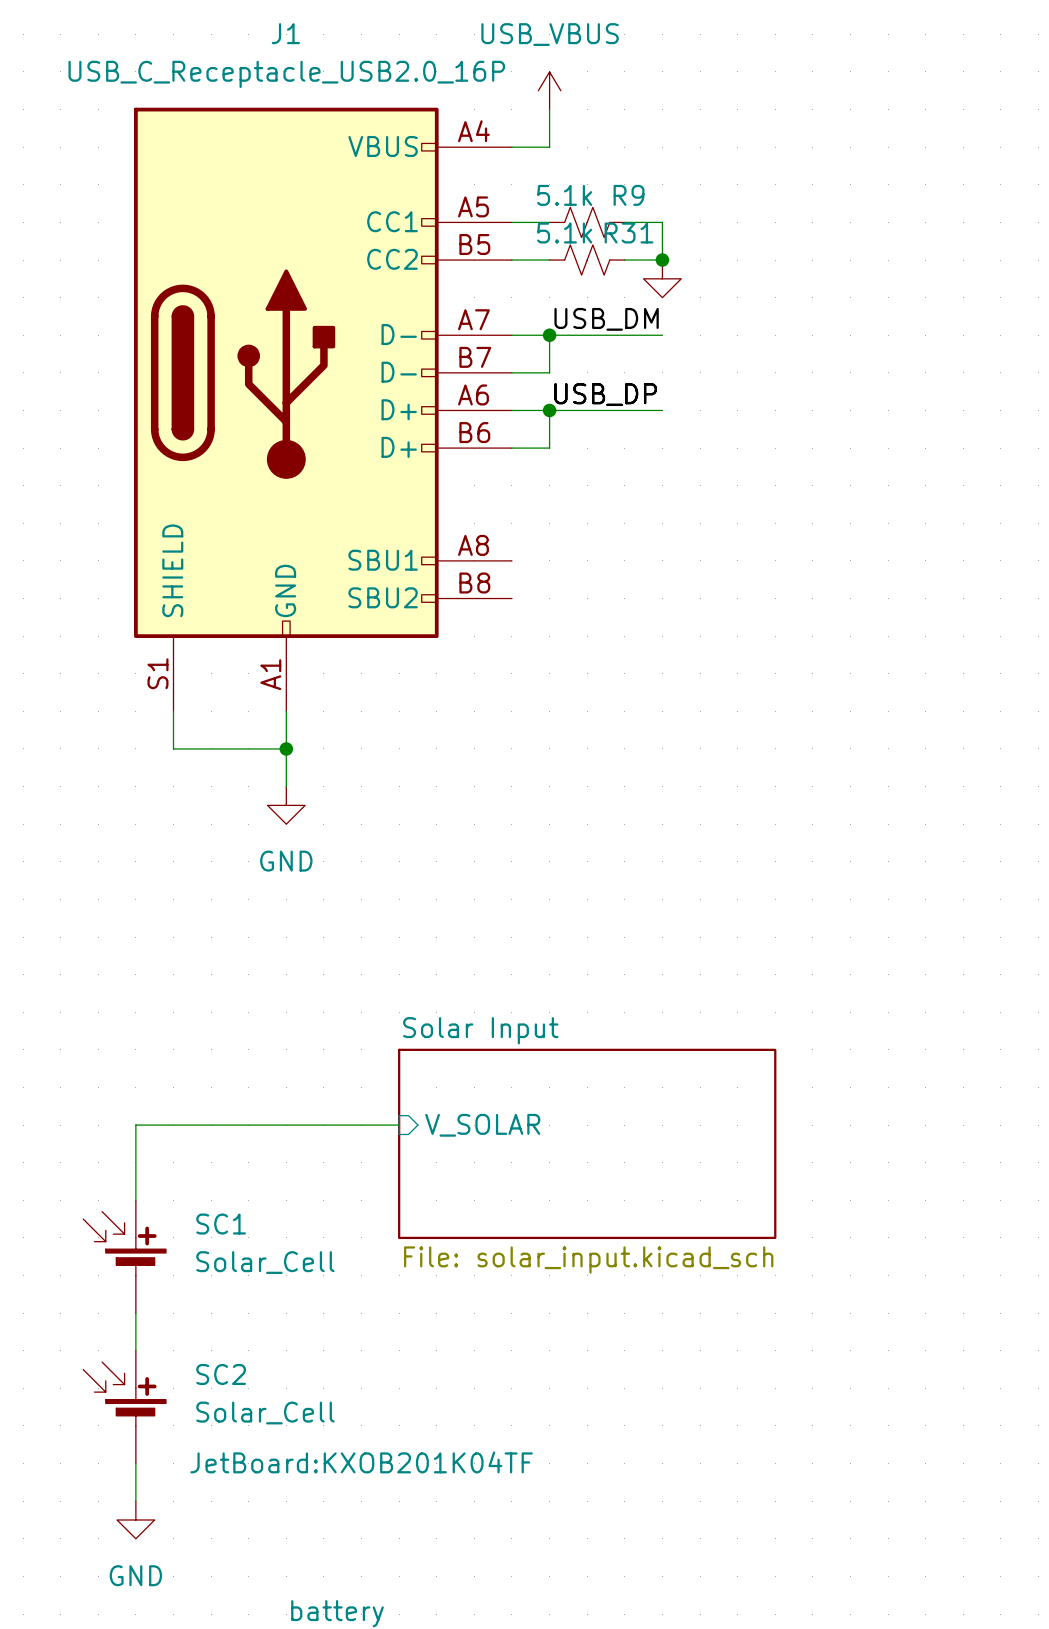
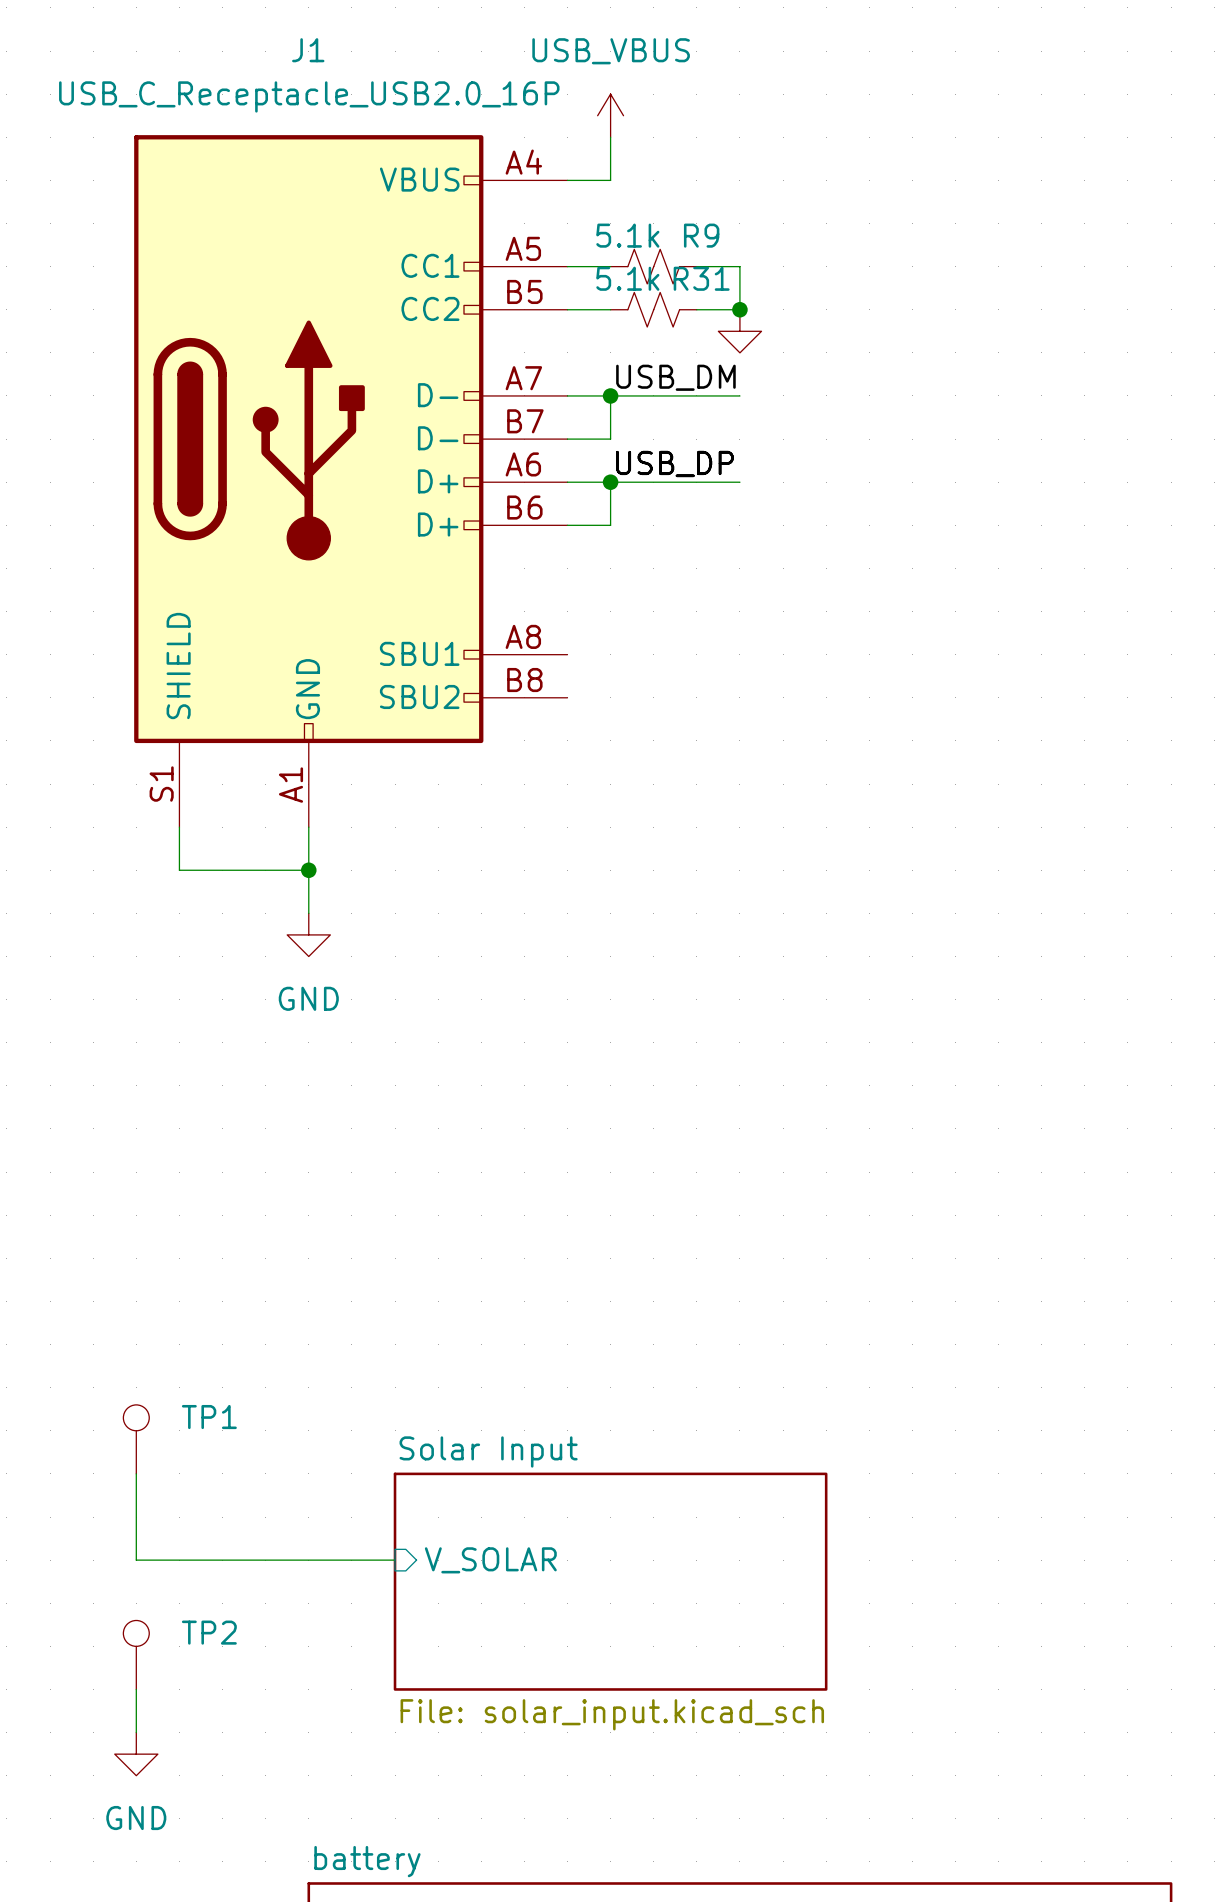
wire: (399, 1125) (135, 1125) (135, 1200) -> none
sheet pin position: V_SOLAR (482, 1125) -> V_SOLAR (490, 1560)
sheet Solar Input position: (587, 1143) -> (610, 1581)
TP1: none -> (136, 1439)
SC1: Solar_Cell (124, 1256) -> none
wire: none -> (136, 1560) (395, 1560)
SC2: Solar_Cell (124, 1407) -> none
TP2: none -> (136, 1654)

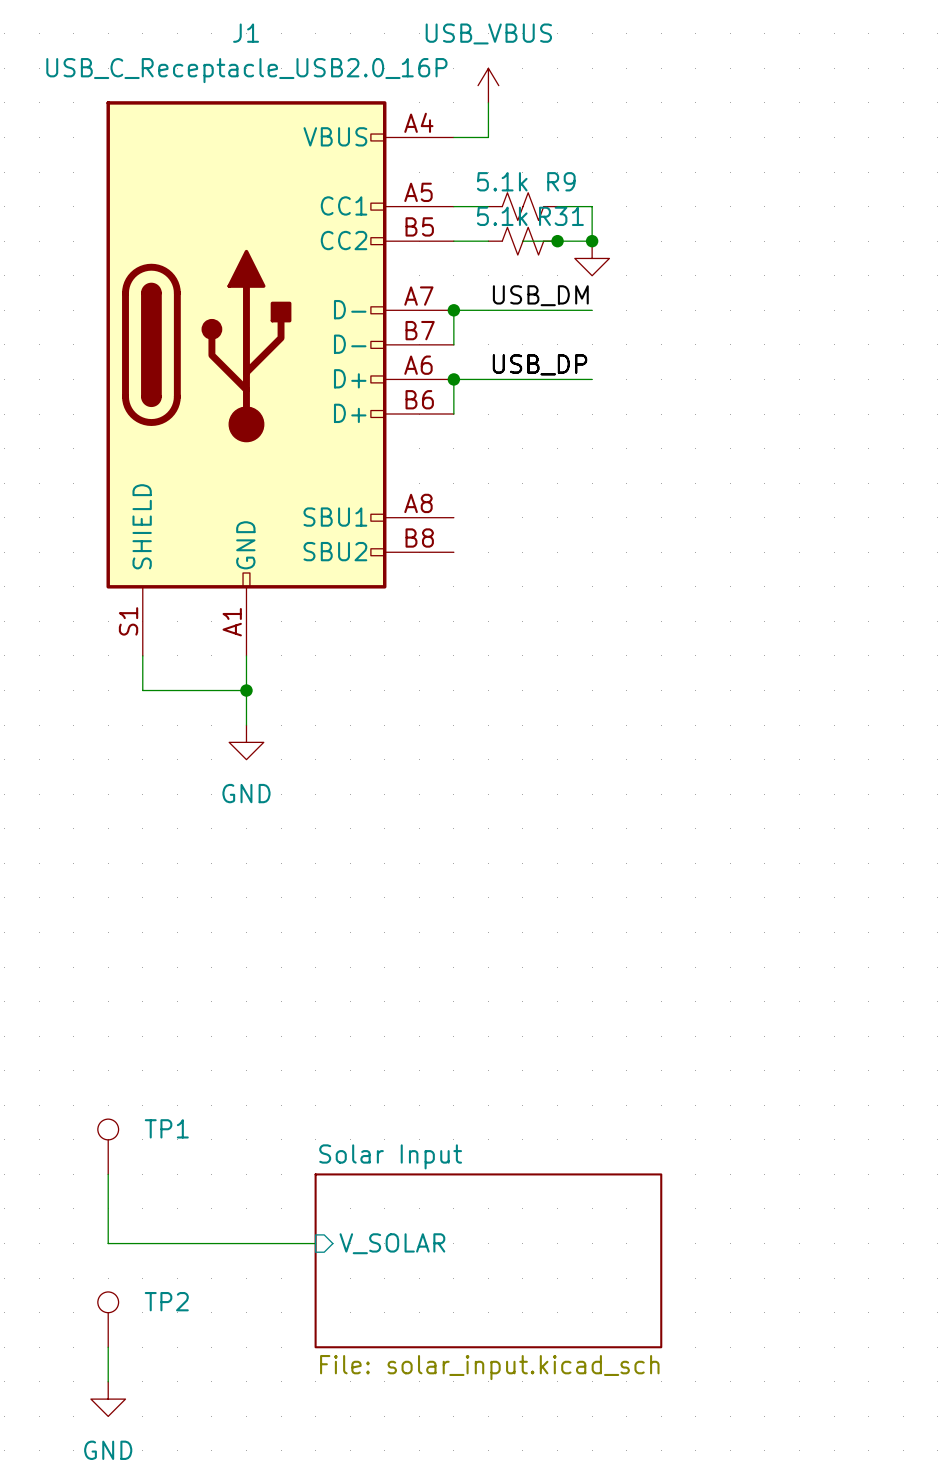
wire: none -> (522, 241) (557, 241)
junction: none -> (557, 241)
wire: (610, 395) (610, 439) (567, 439) -> (453, 310) (453, 344)
junction position: (610, 395) -> (453, 310)
wire: (610, 482) (610, 525) (567, 525) -> (453, 379) (453, 414)
junction position: (610, 482) -> (453, 379)

